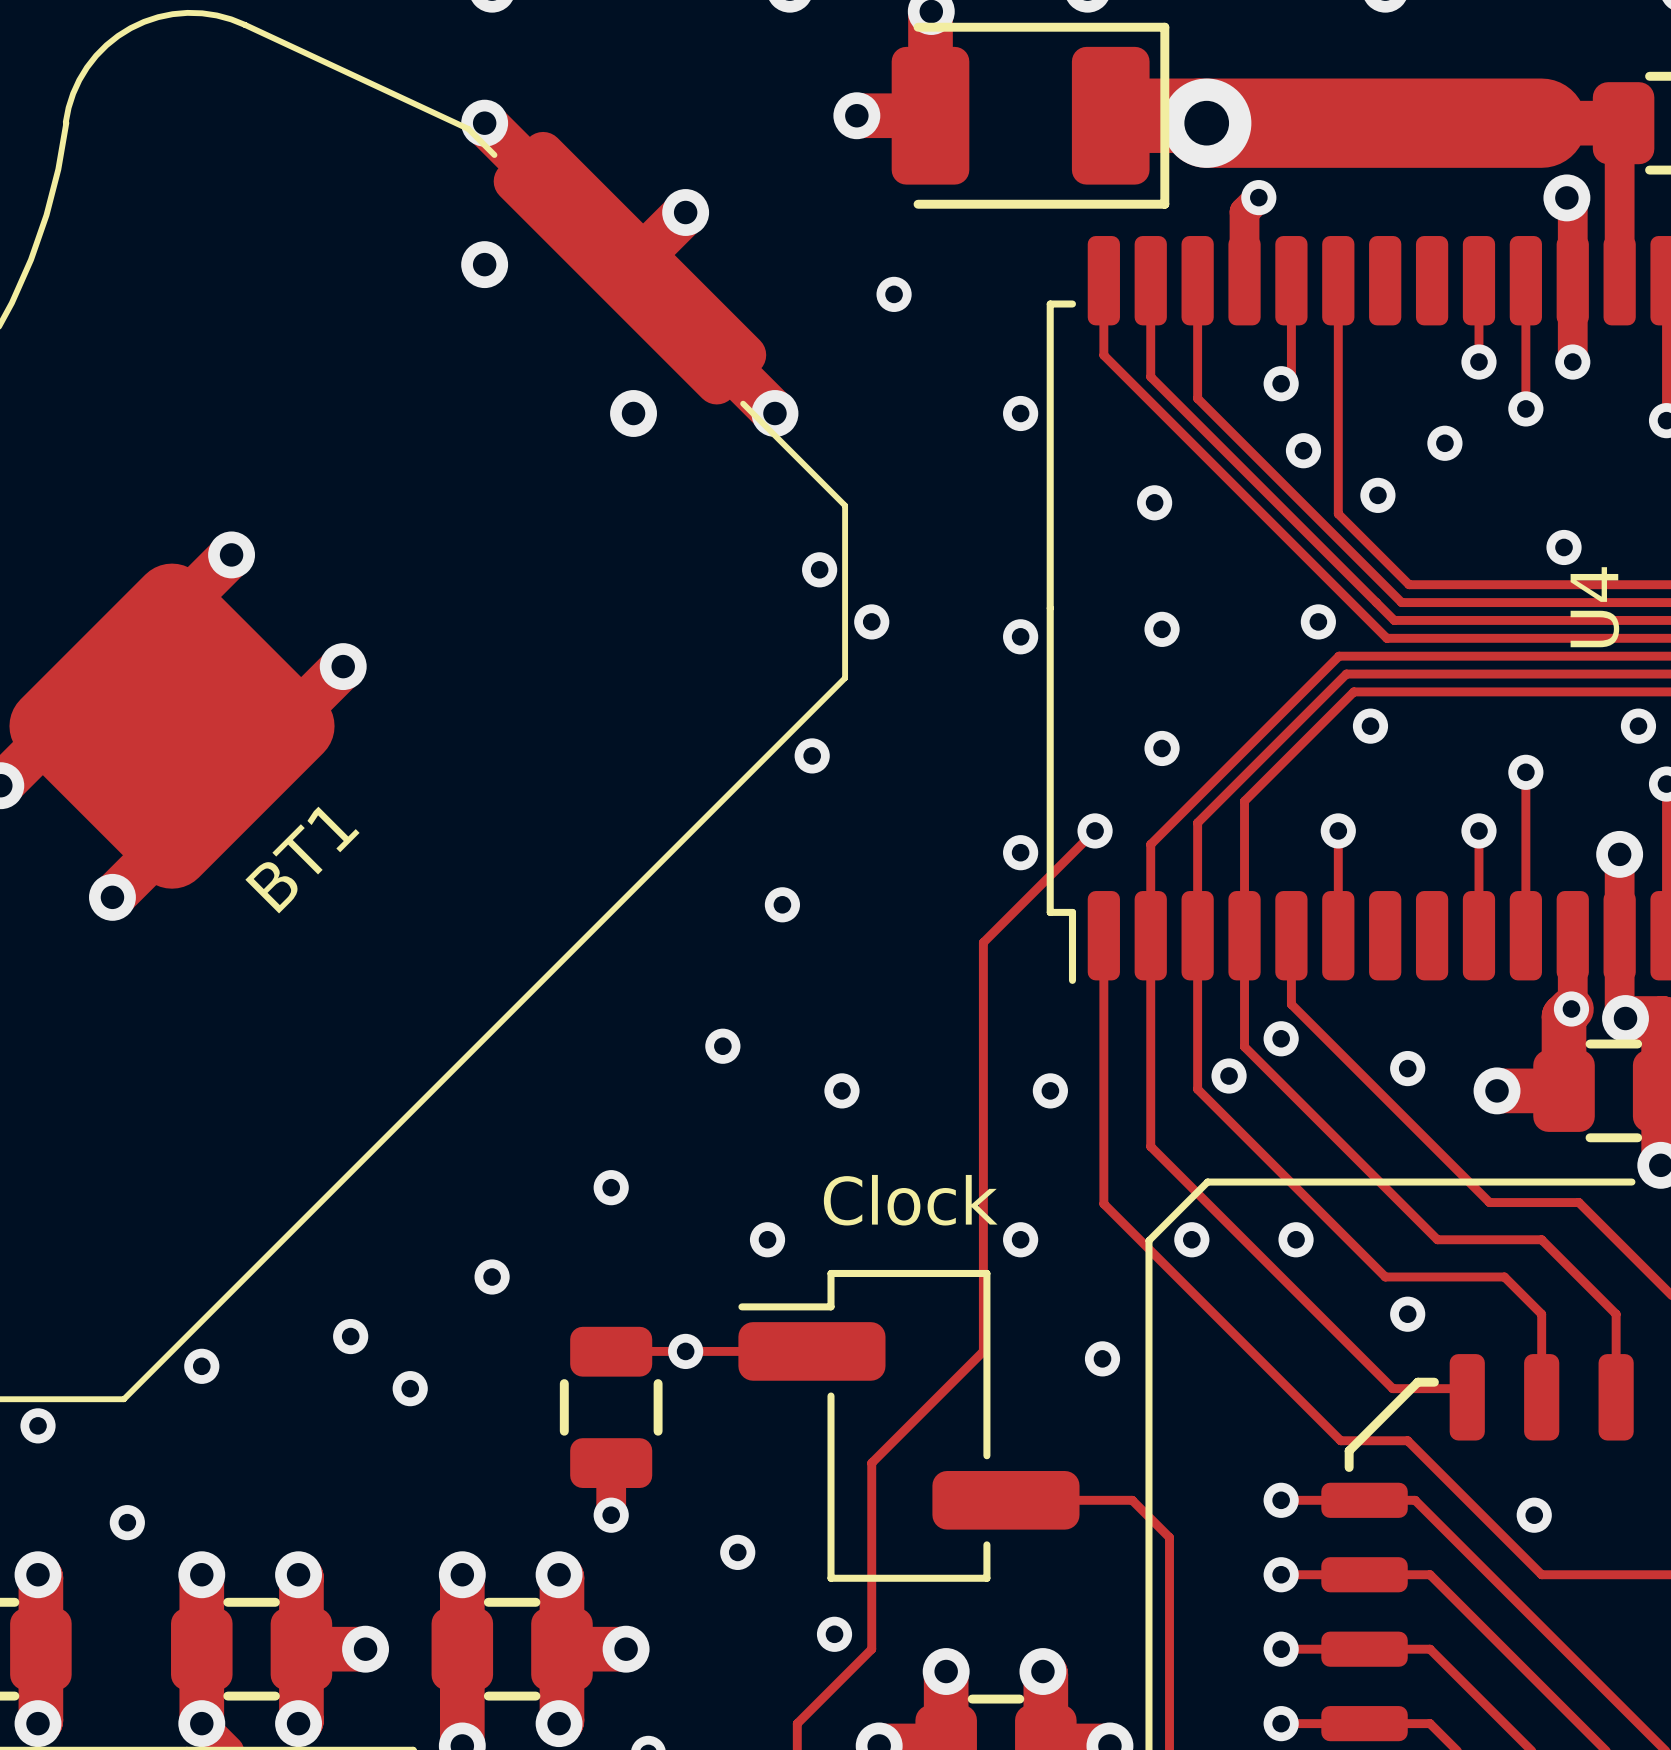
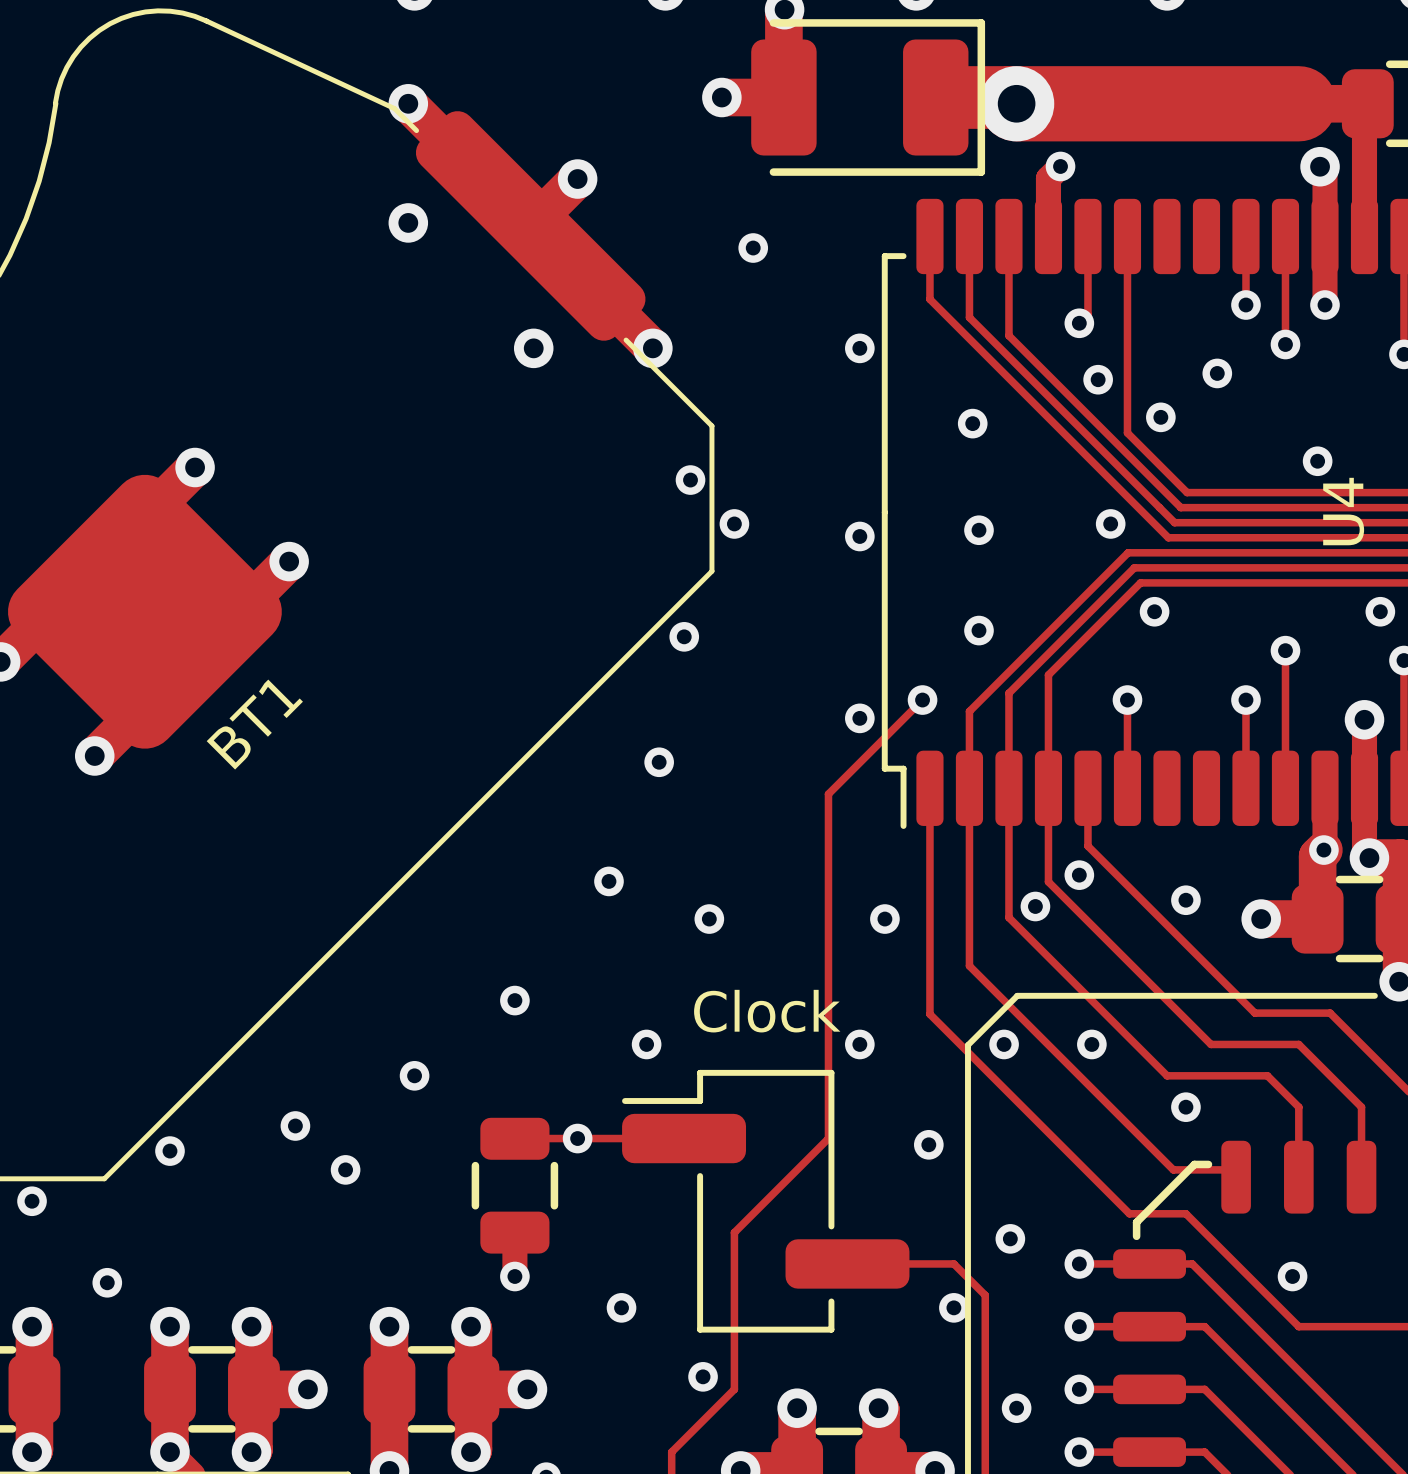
via: none -> (1010, 1238)
via: none -> (953, 1307)
via: none -> (1016, 1408)

